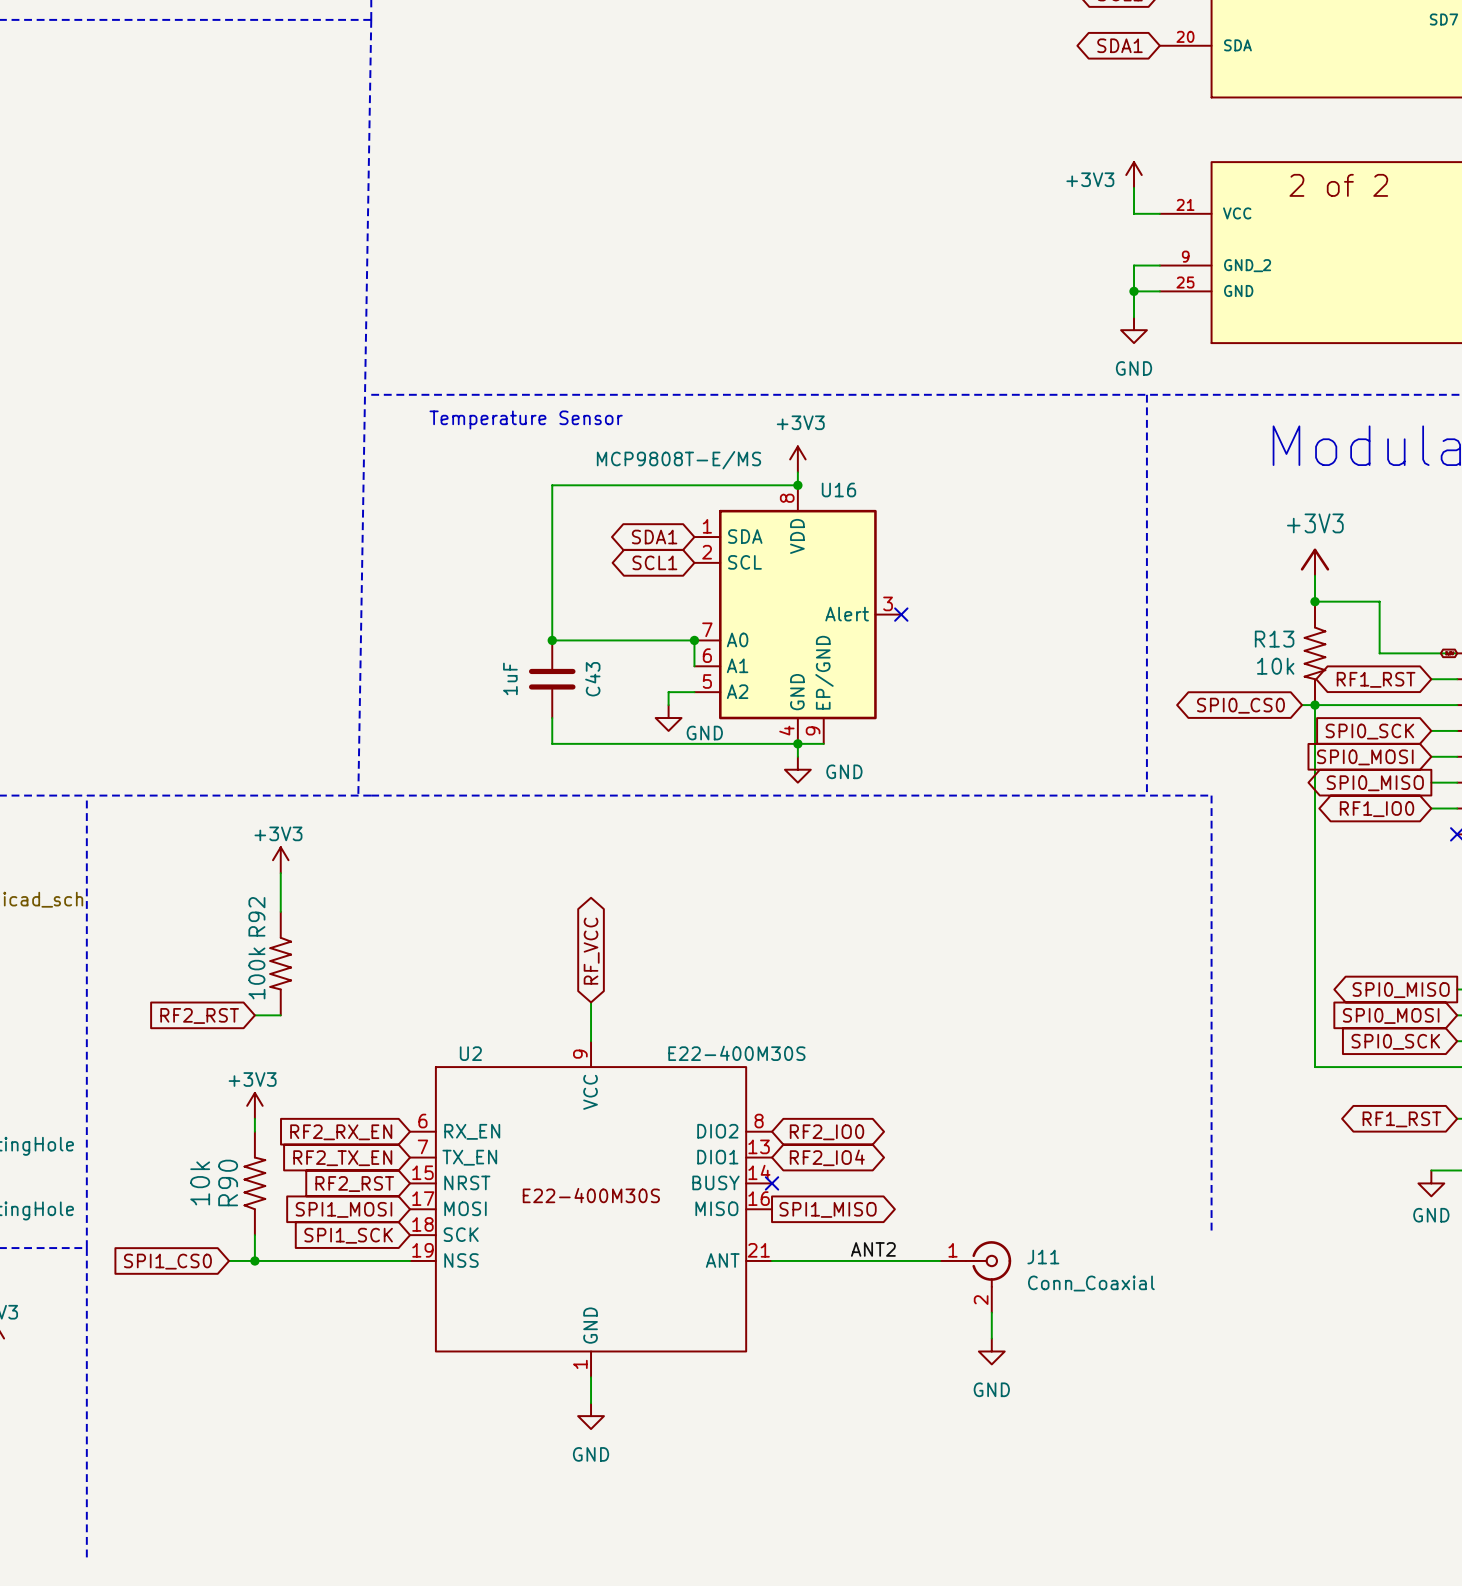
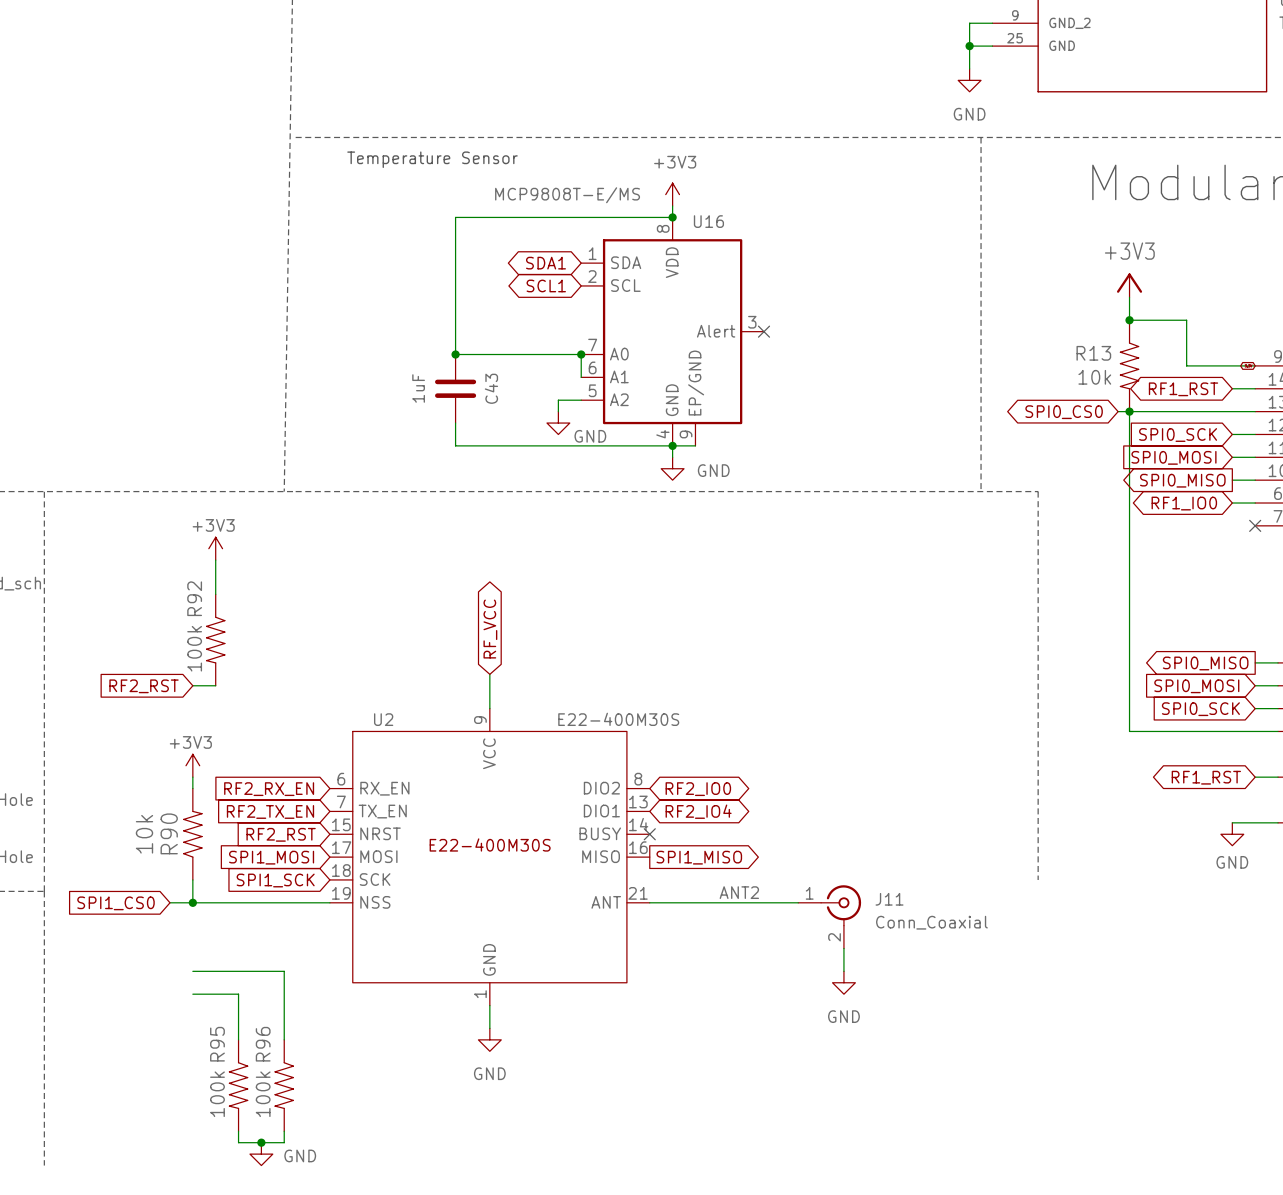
wire: none -> (192, 971) (284, 971) (284, 1039)
wire: none -> (192, 994) (238, 994) (238, 1039)
R95: none -> 100k (238, 1085)
R96: none -> 100k (284, 1085)
wire: none -> (238, 1131) (238, 1142) (284, 1142) (284, 1131)
junction: none -> (261, 1142)
power symbol: none -> GND (261, 1154)

